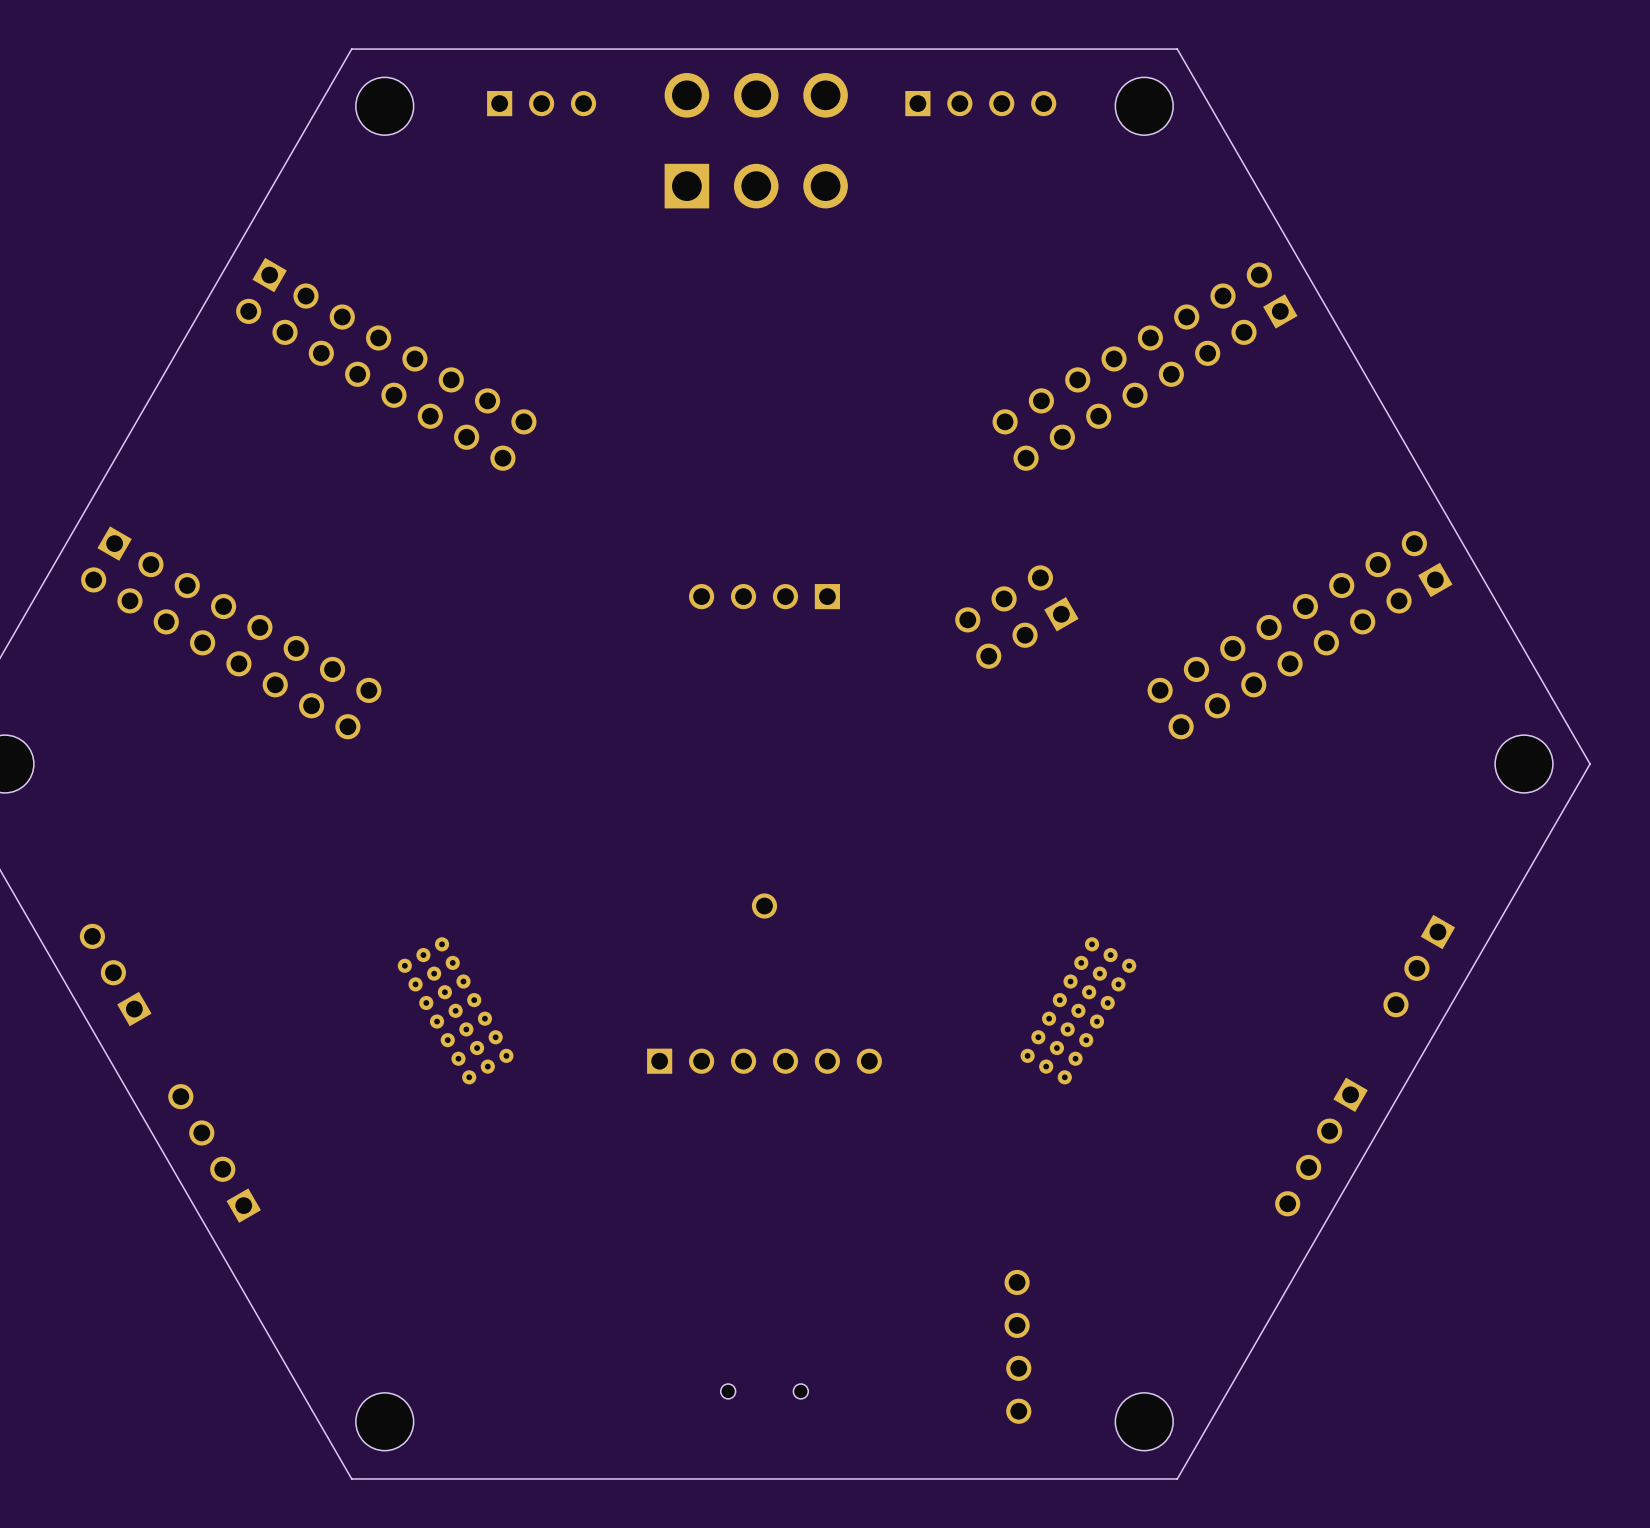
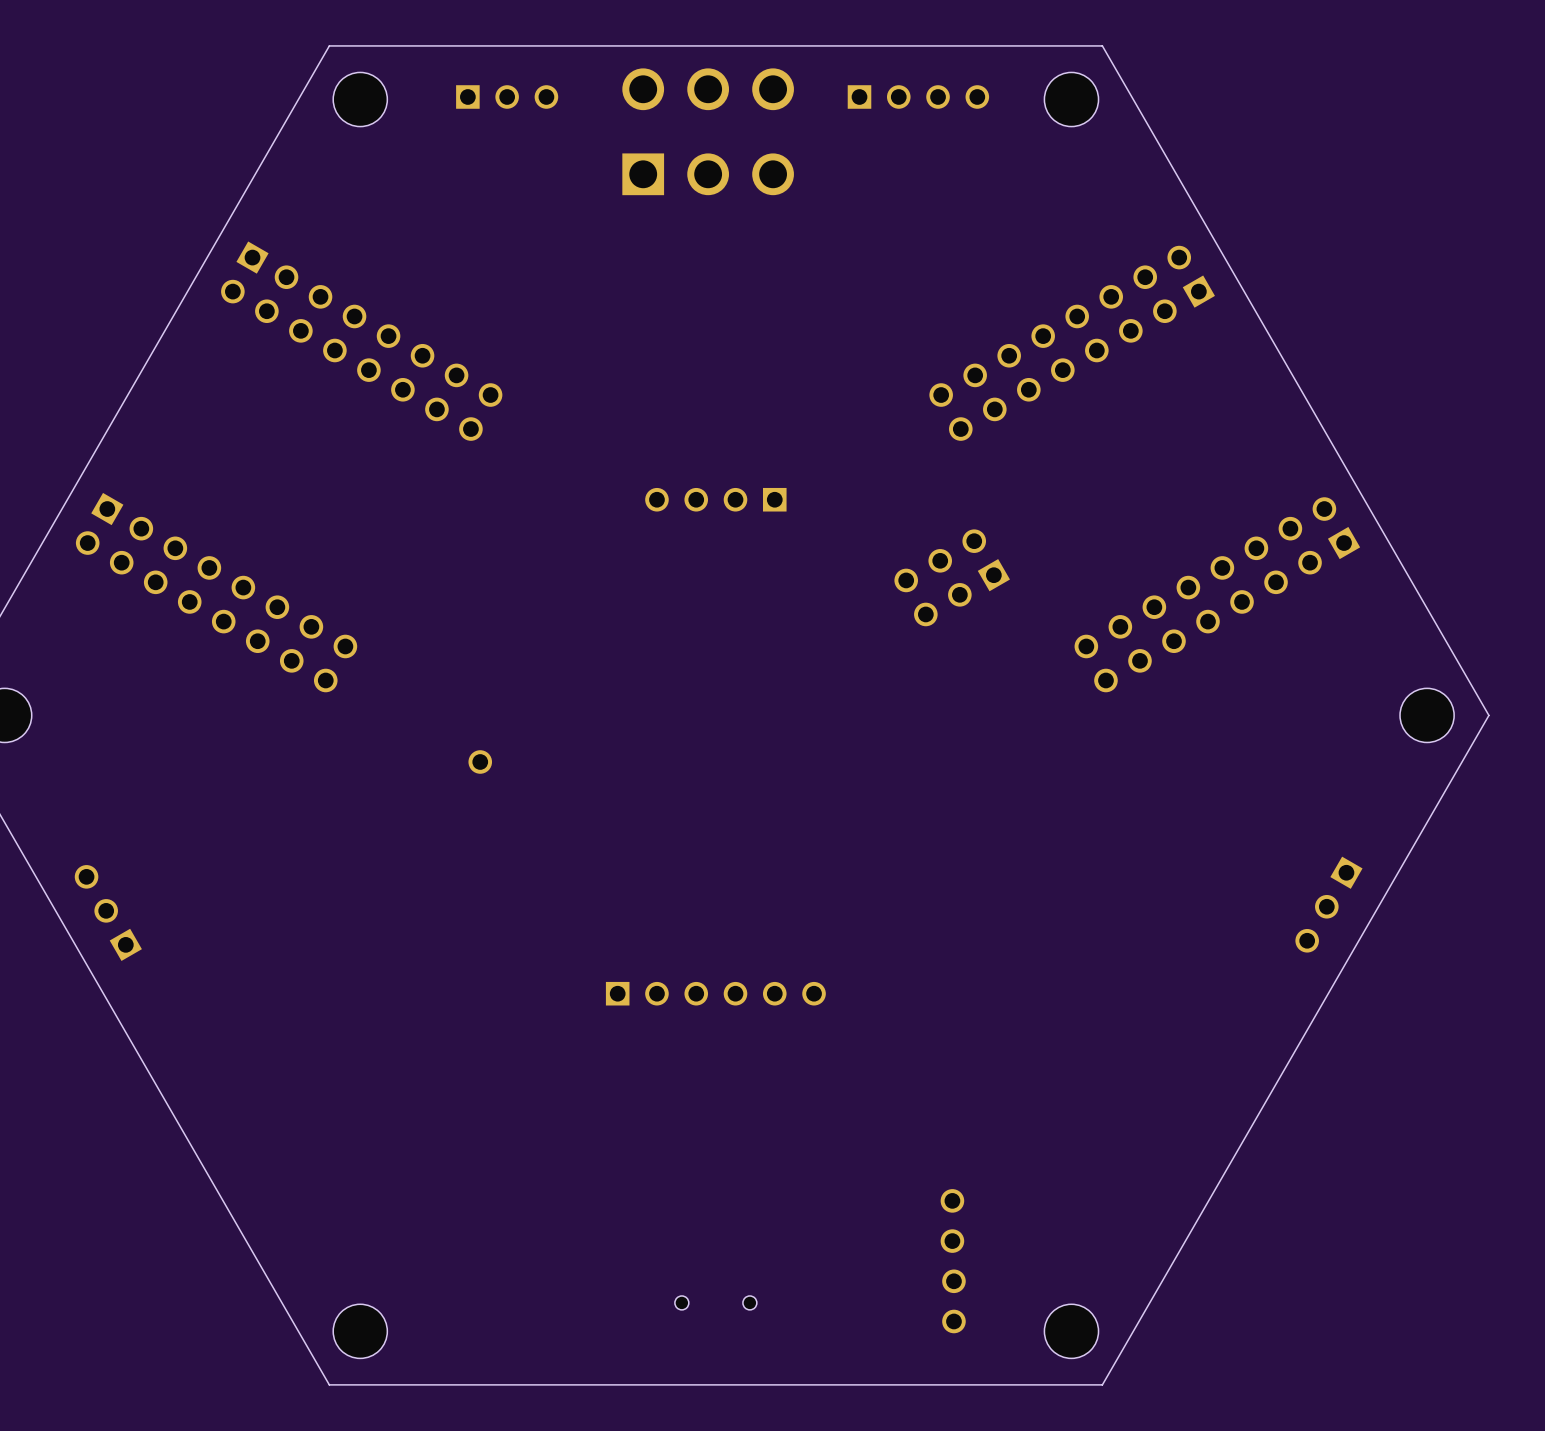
part position: (764, 596) -> (715, 499)
part position: (764, 906) -> (480, 761)
part: (455, 1010) -> none
part: (1078, 1010) -> none
part: (1321, 1146) -> none
part: (214, 1153) -> none

